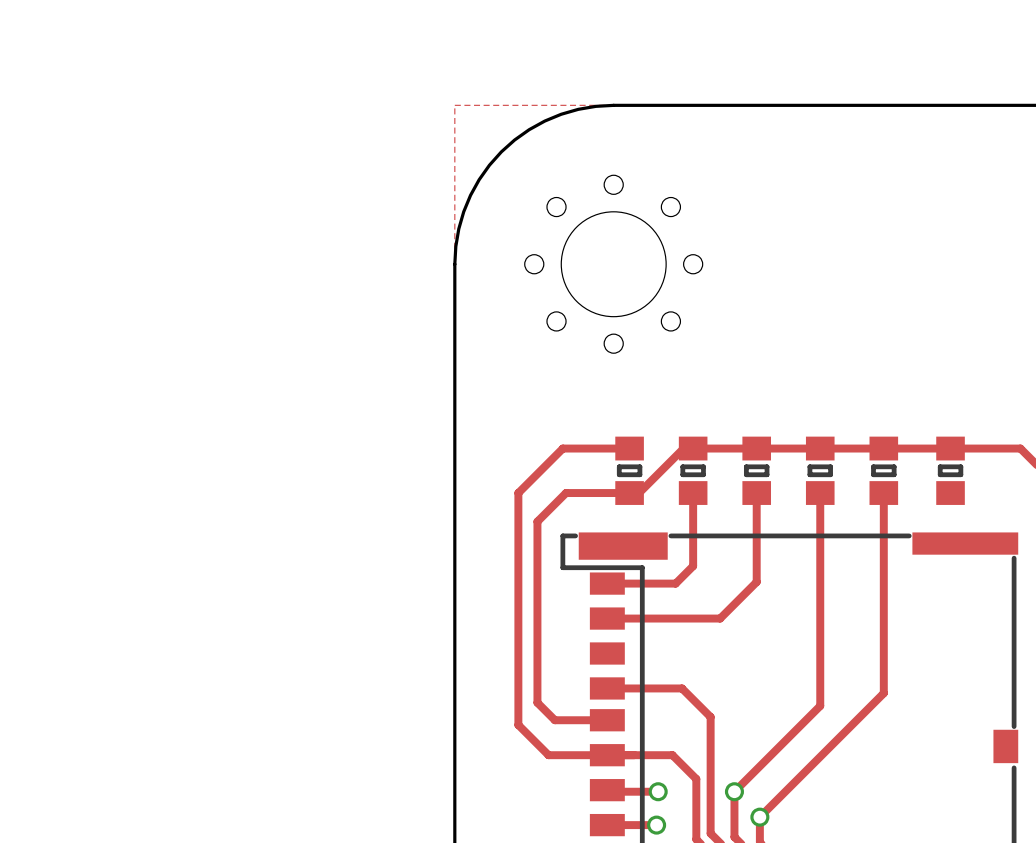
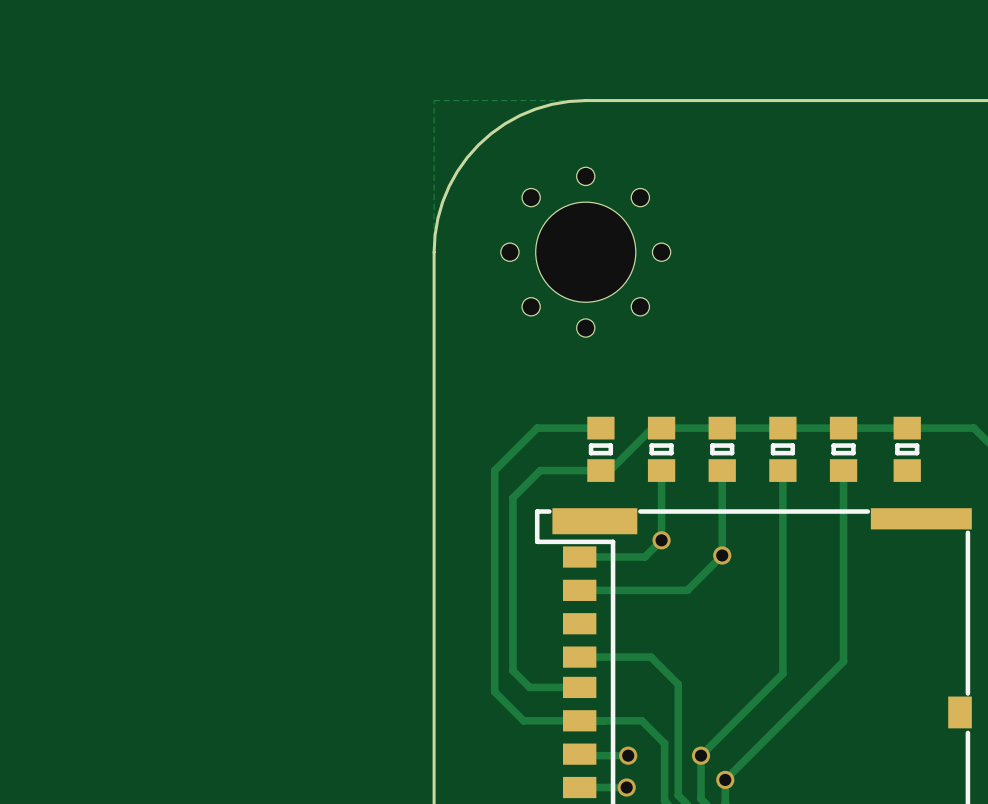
via: none -> (661, 540)
via: none -> (722, 555)

